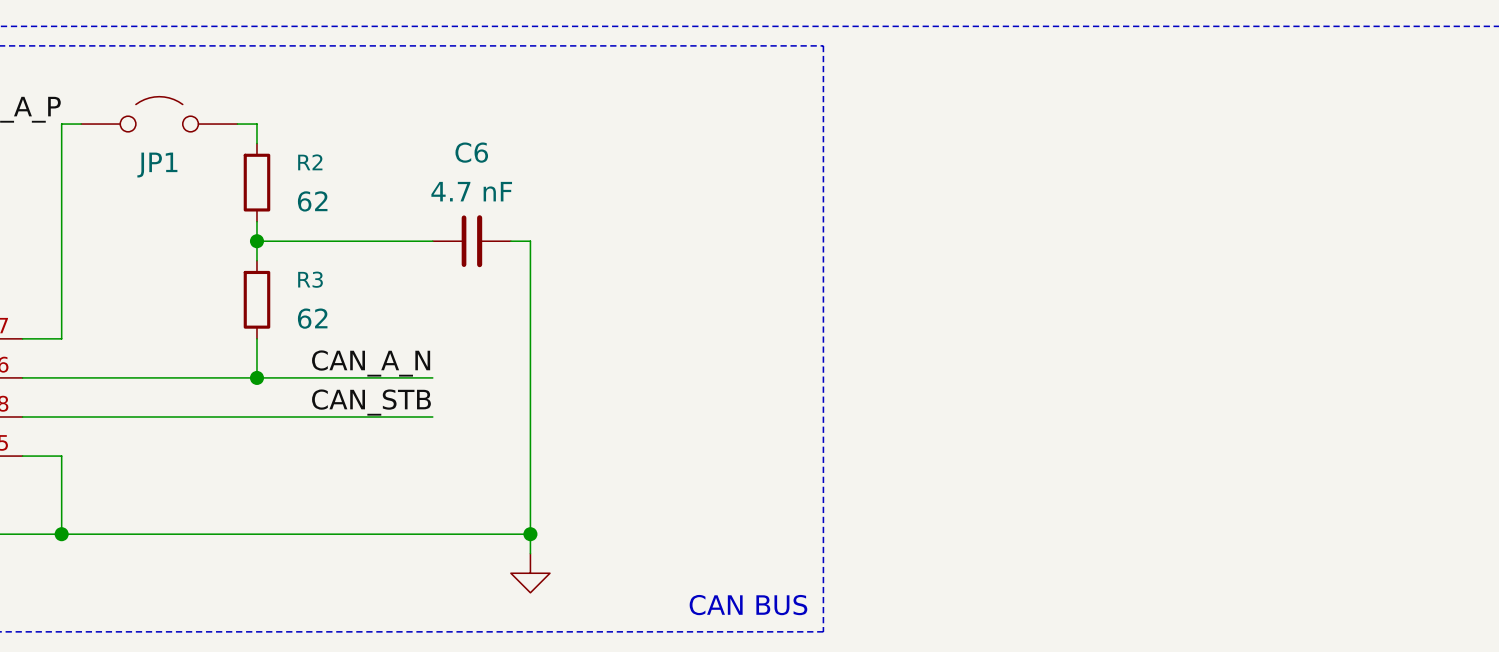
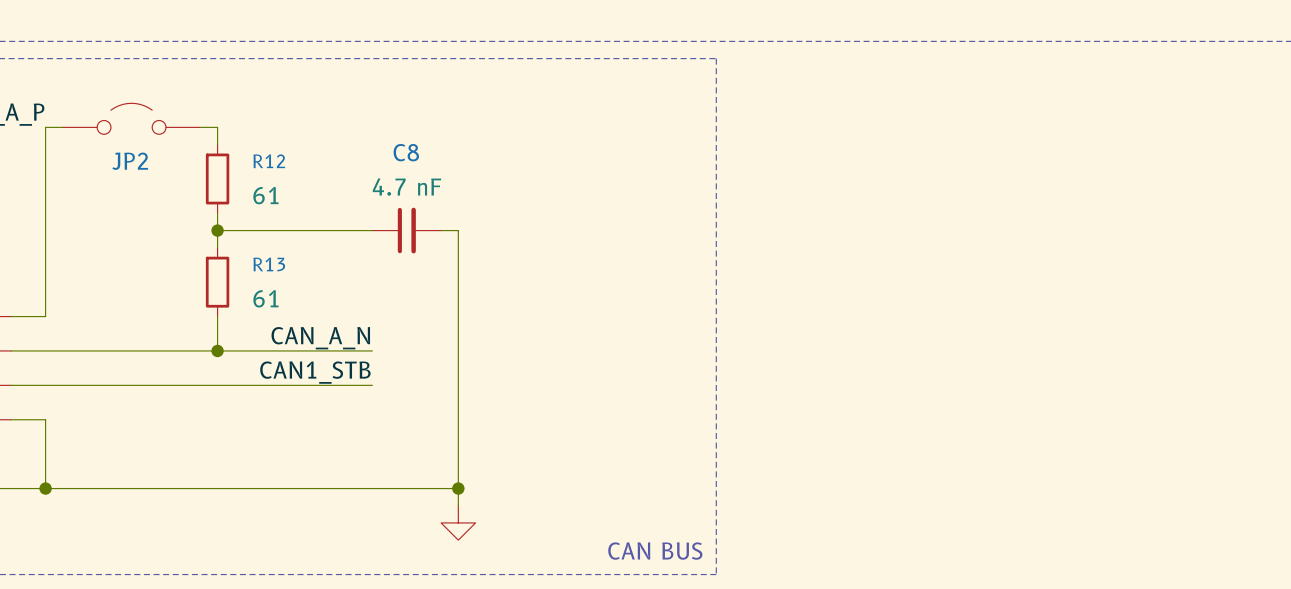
C6 name: C6 (471, 152) -> C8 (406, 152)
R2 name: R2 (310, 162) -> R12 (269, 161)
JP1 name: JP1 (157, 165) -> JP2 (130, 161)
R2 value: 62 (312, 201) -> 61 (265, 195)
R3 name: R3 (310, 279) -> R13 (269, 264)
R3 value: 62 (312, 318) -> 61 (265, 298)
label: CAN_STB (371, 402) -> CAN1_STB (315, 372)

